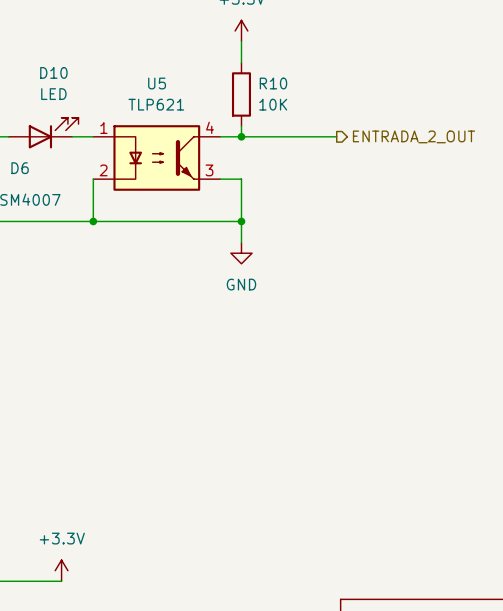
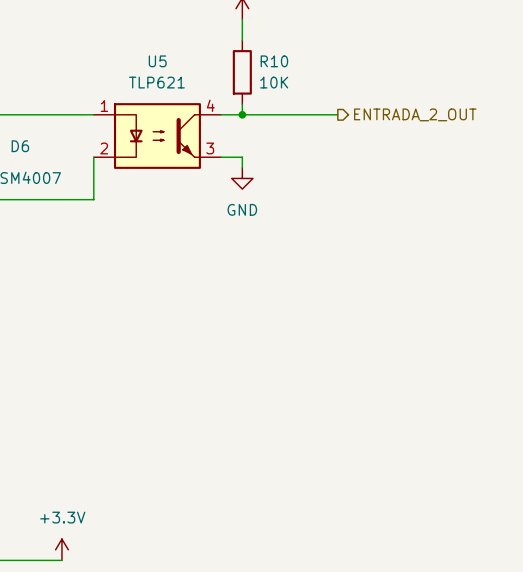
D10: LED (43, 133) -> none
wire: (241, 189) (241, 242) -> none
wire: (93, 221) (241, 221) -> none
junction: (93, 221) -> none
junction: (241, 221) -> none
power symbol position: GND (241, 253) -> GND (242, 178)

